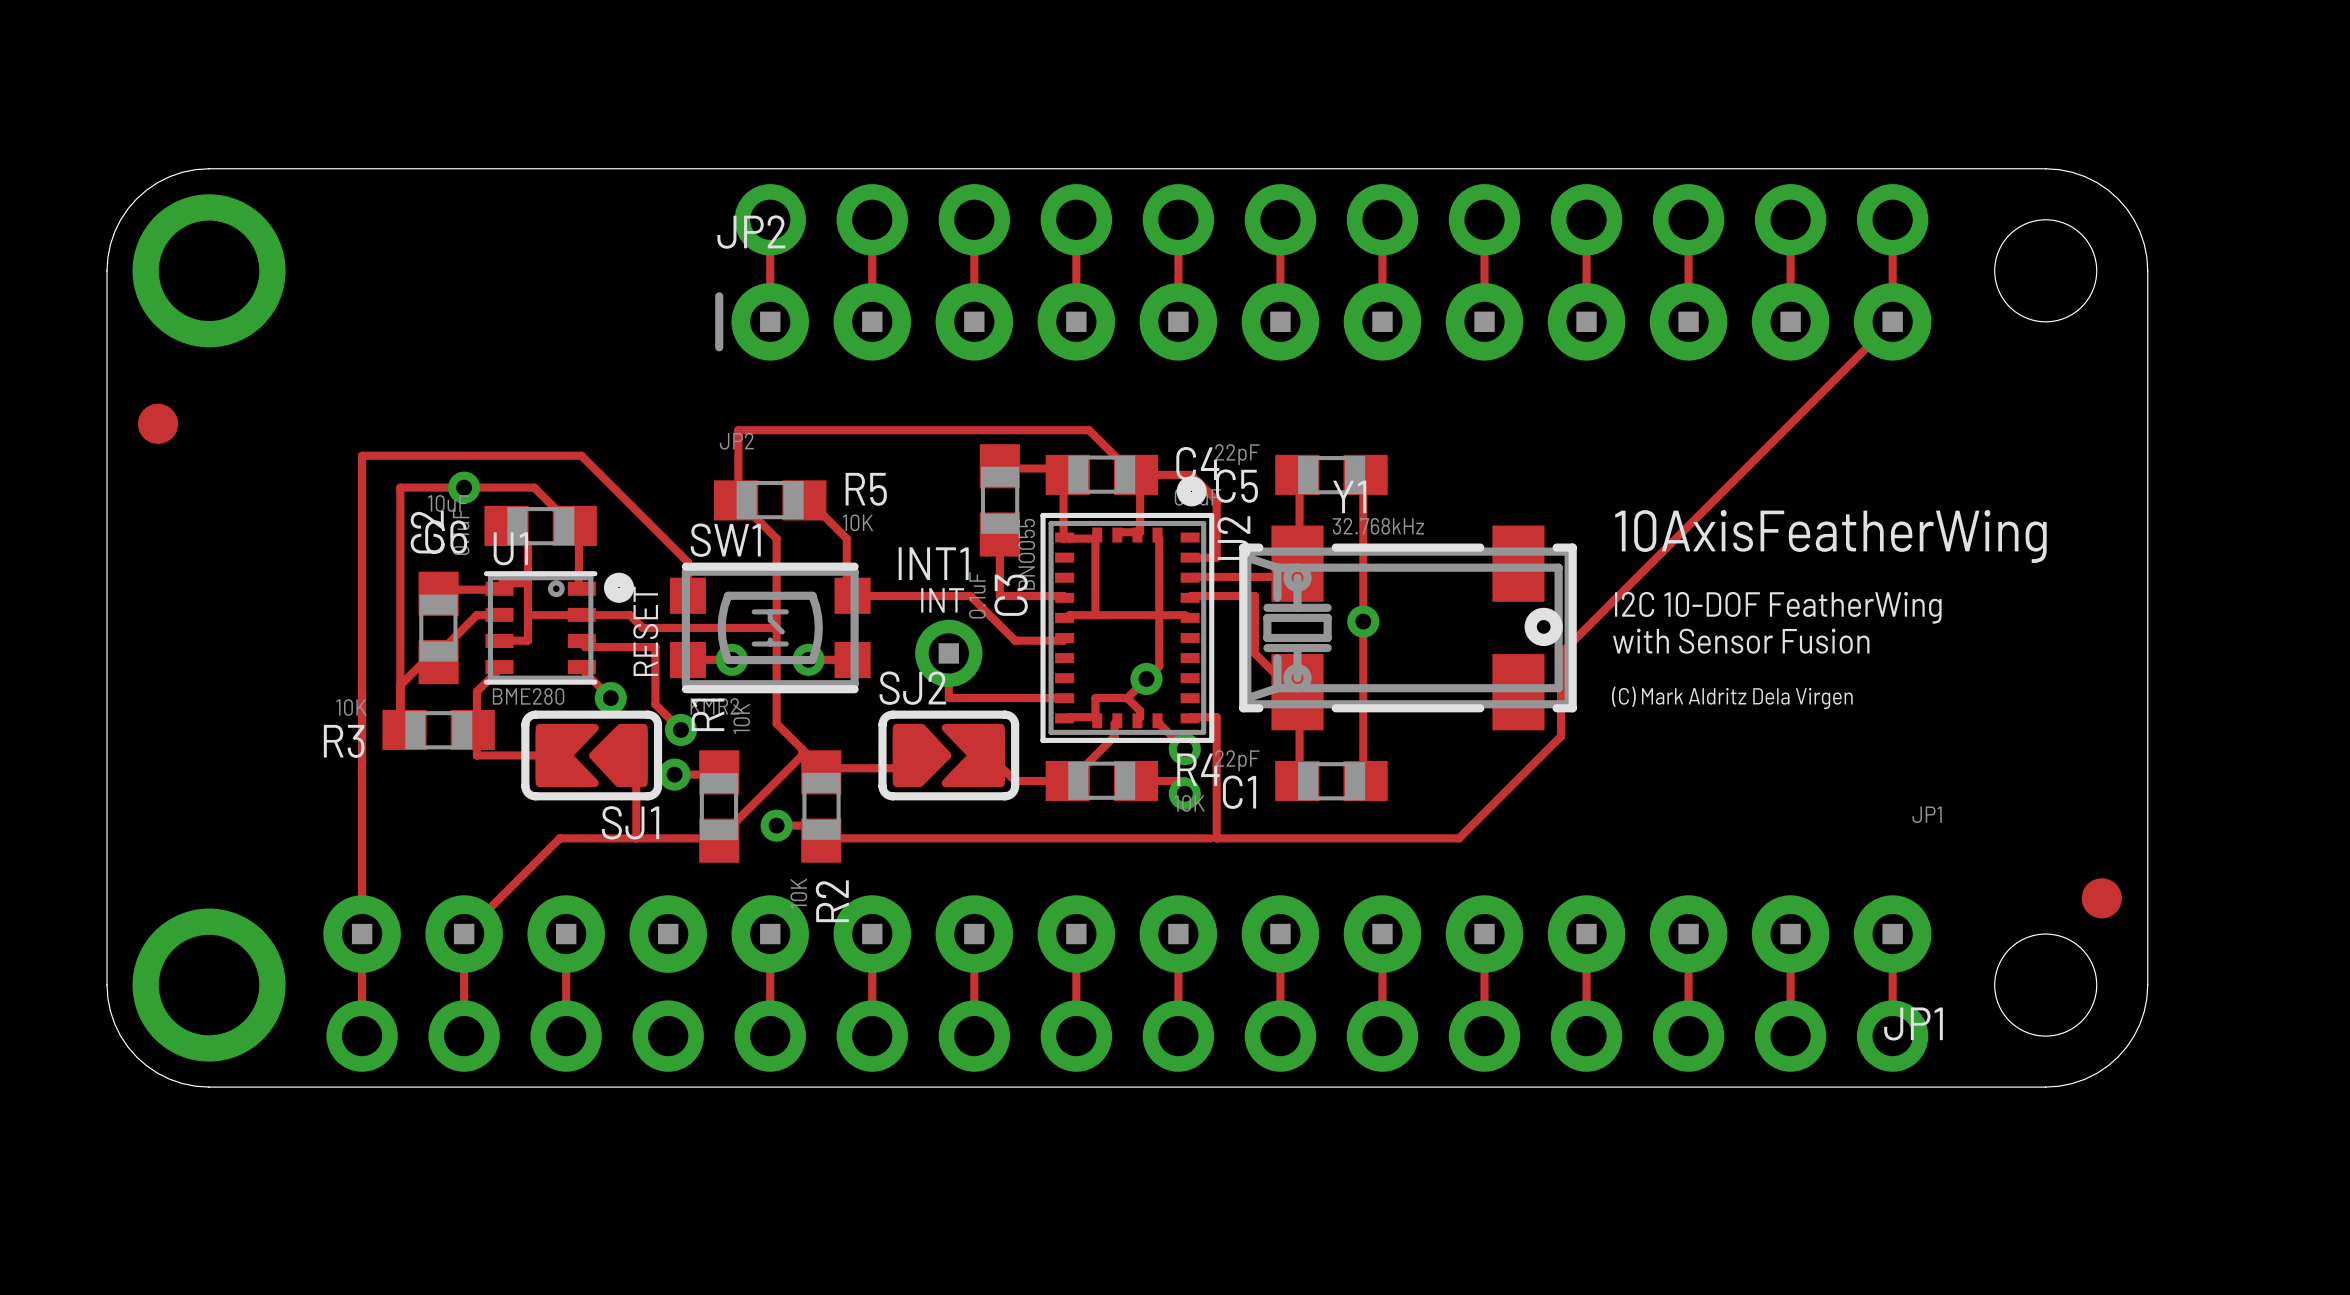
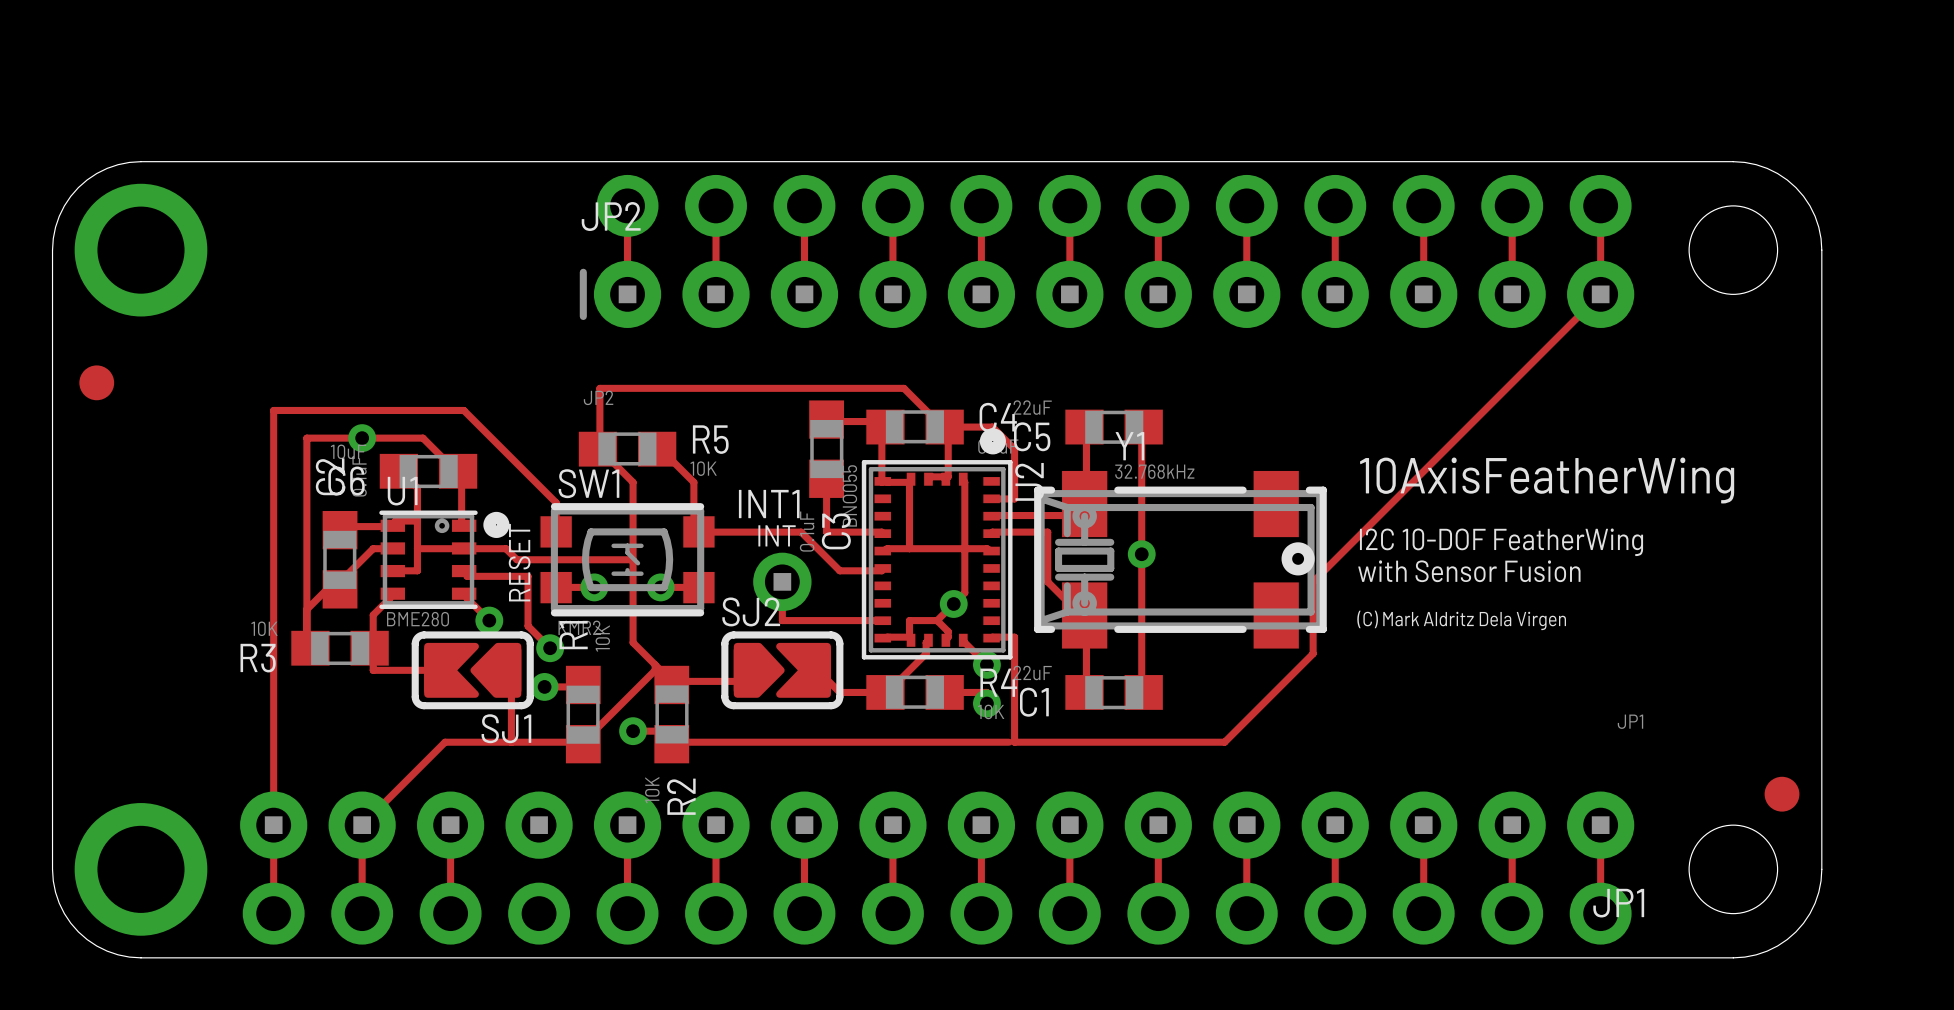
C5 value: 22pF (1237, 454) -> 22uF (1032, 407)
C1 value: 22pF (1237, 760) -> 22uF (1032, 672)

